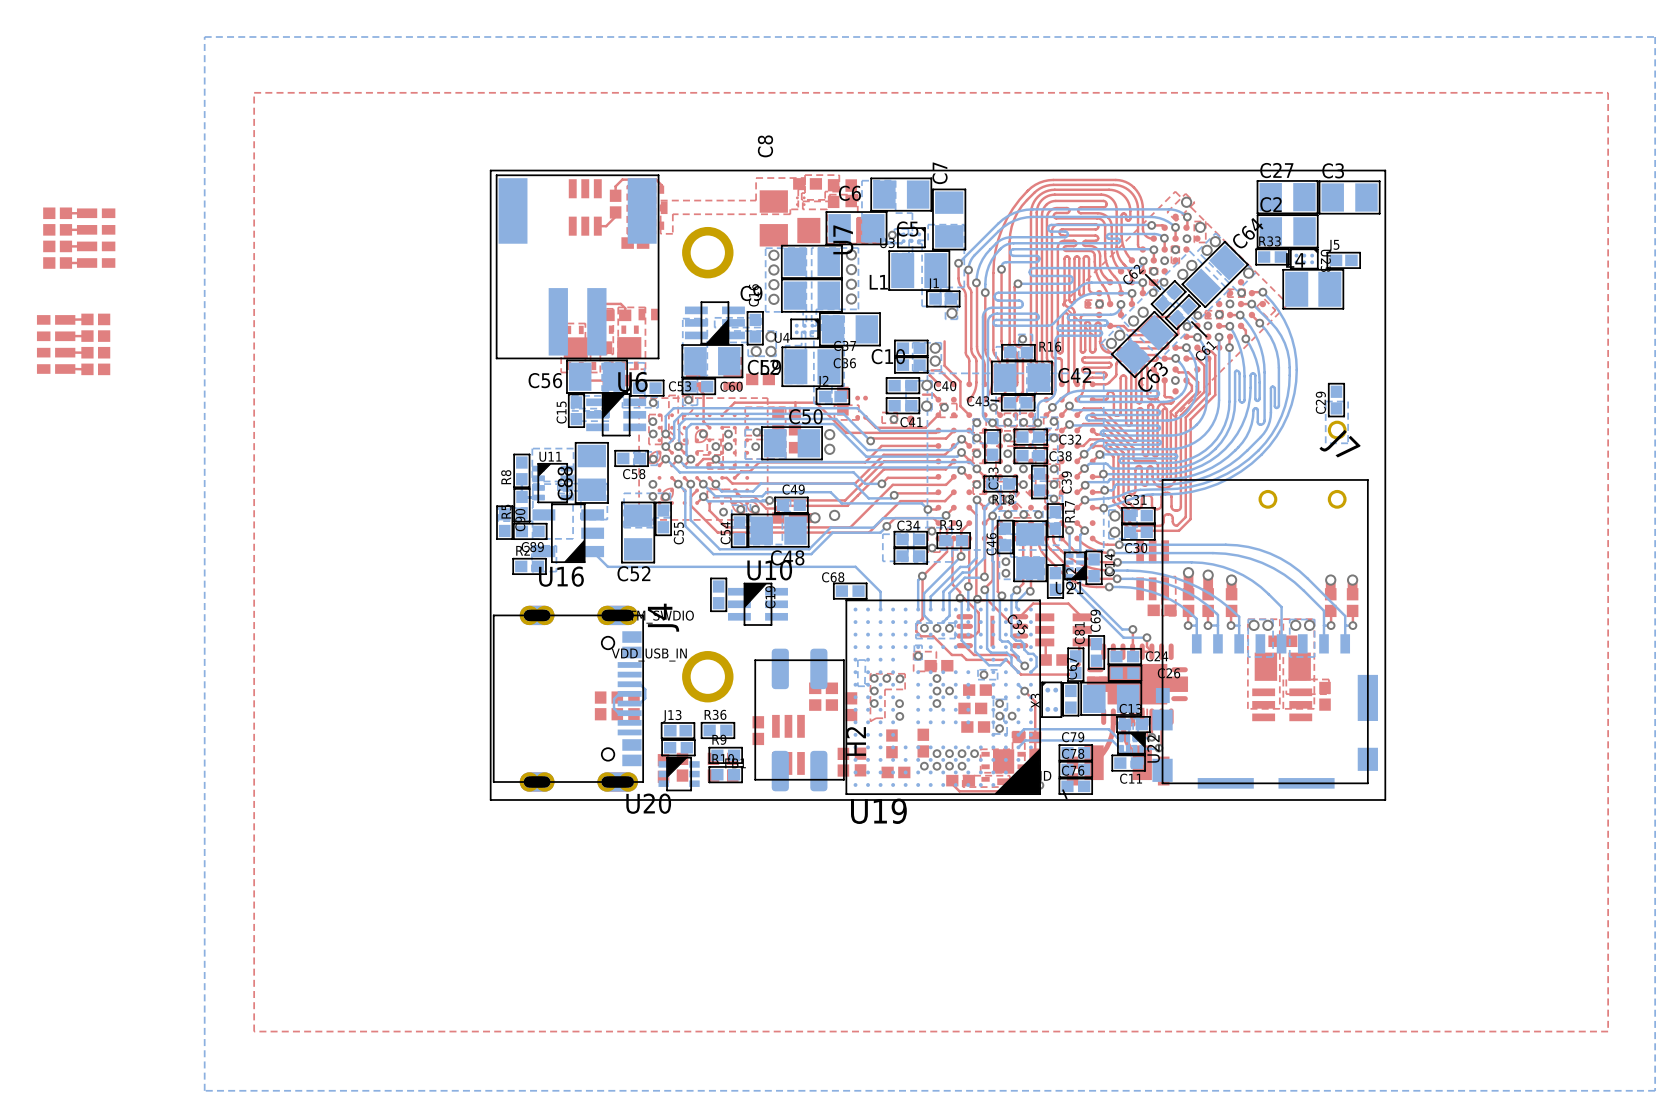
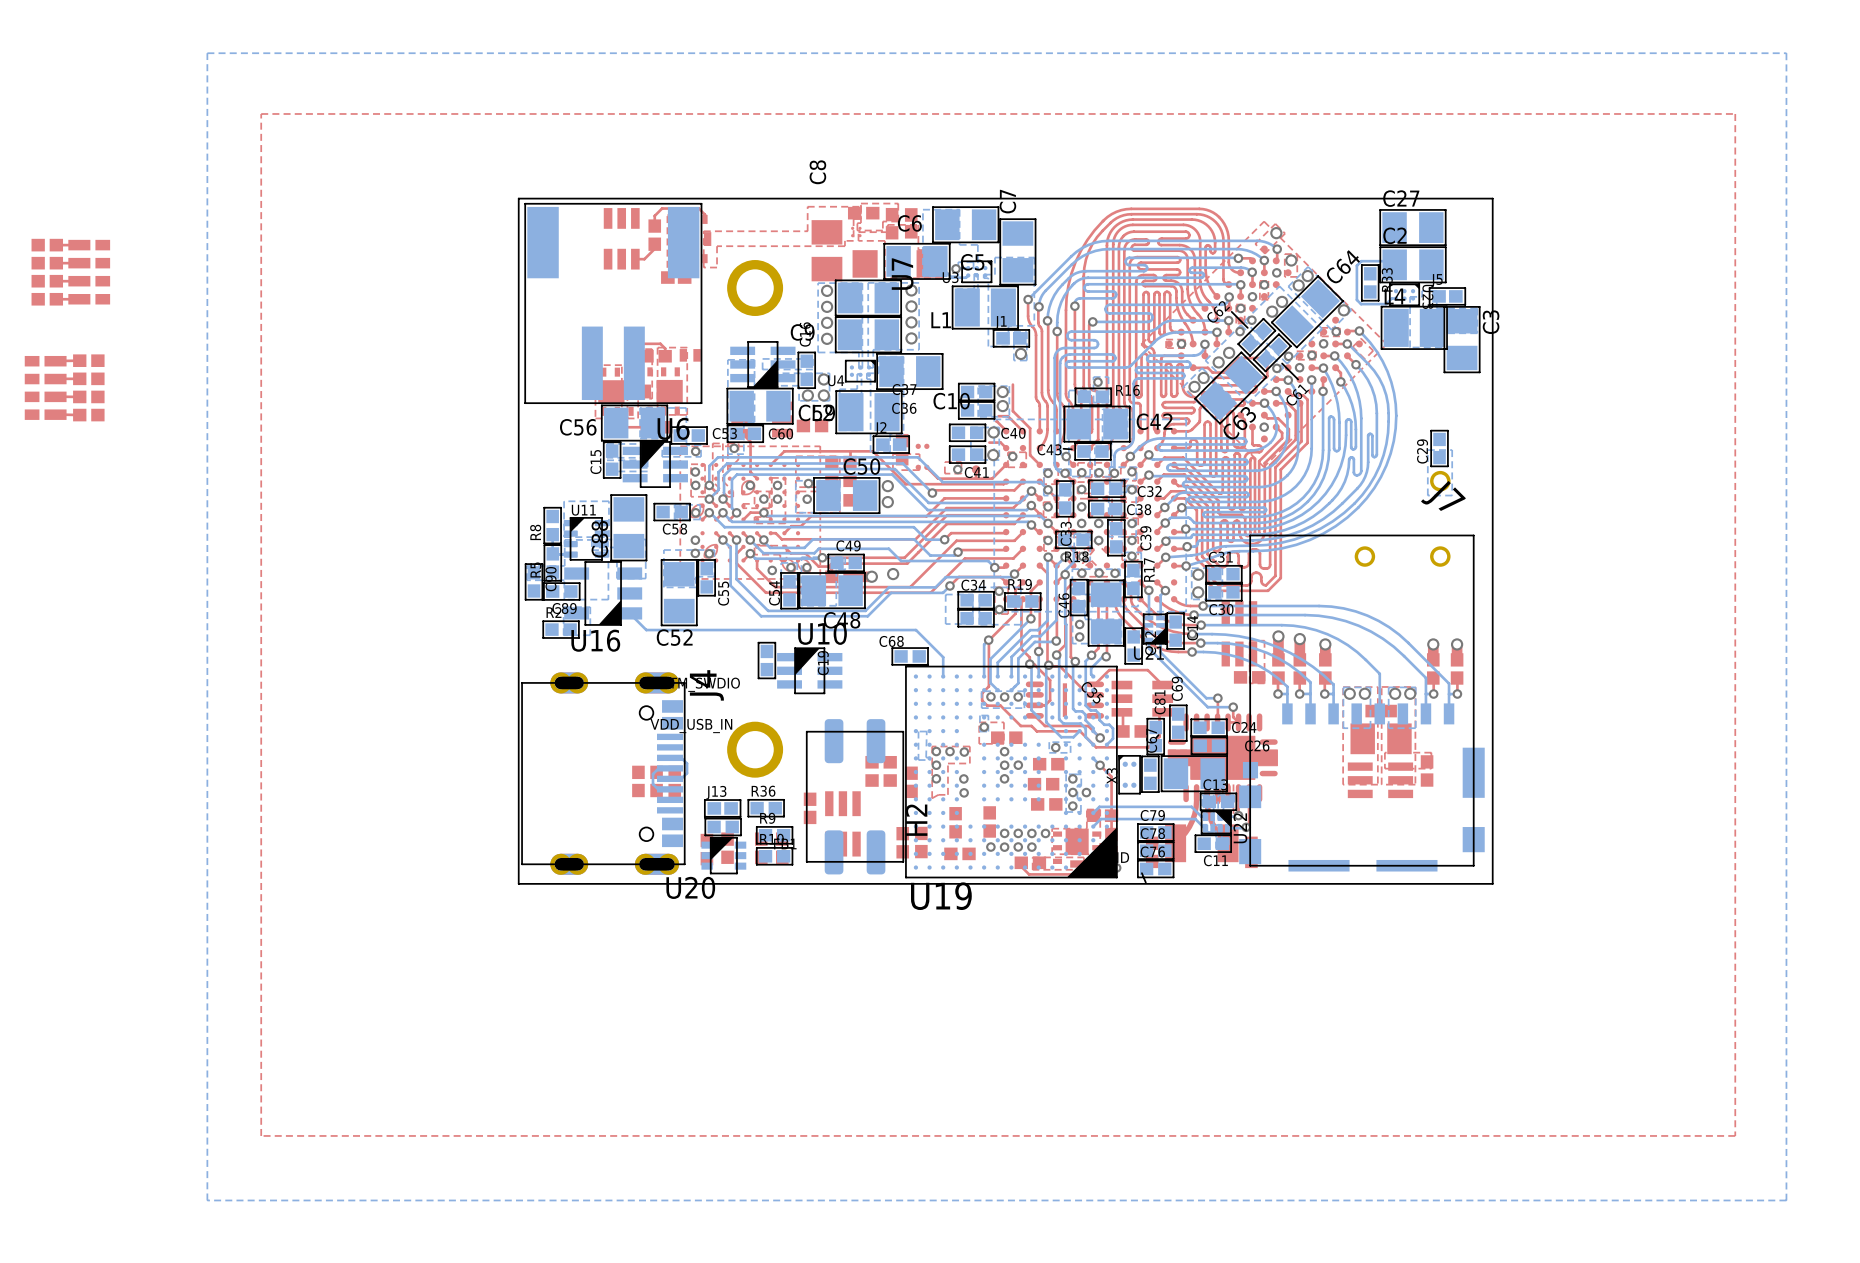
C27 position: (1287, 197) -> (1412, 227)
C3 rotation: 0° (1349, 197) -> 90° clockwise (1462, 339)
C3 position: (1349, 197) -> (1462, 339)
C2 position: (1287, 231) -> (1413, 264)
bottom track: none -> (1394, 264) (1391, 261) (1361, 261) (1356, 265) (1356, 299) (1361, 304) (1386, 304) (1391, 298) (1396, 298)
bottom zone outline: none -> (1436, 290) (1436, 308) (1477, 308) (1477, 333) (1441, 333) (1441, 347) (1410, 347) (1410, 296) (1422, 296) (1422, 290) (1436, 290)
R33 rotation: 0° (1272, 257) -> 90° clockwise (1370, 282)

